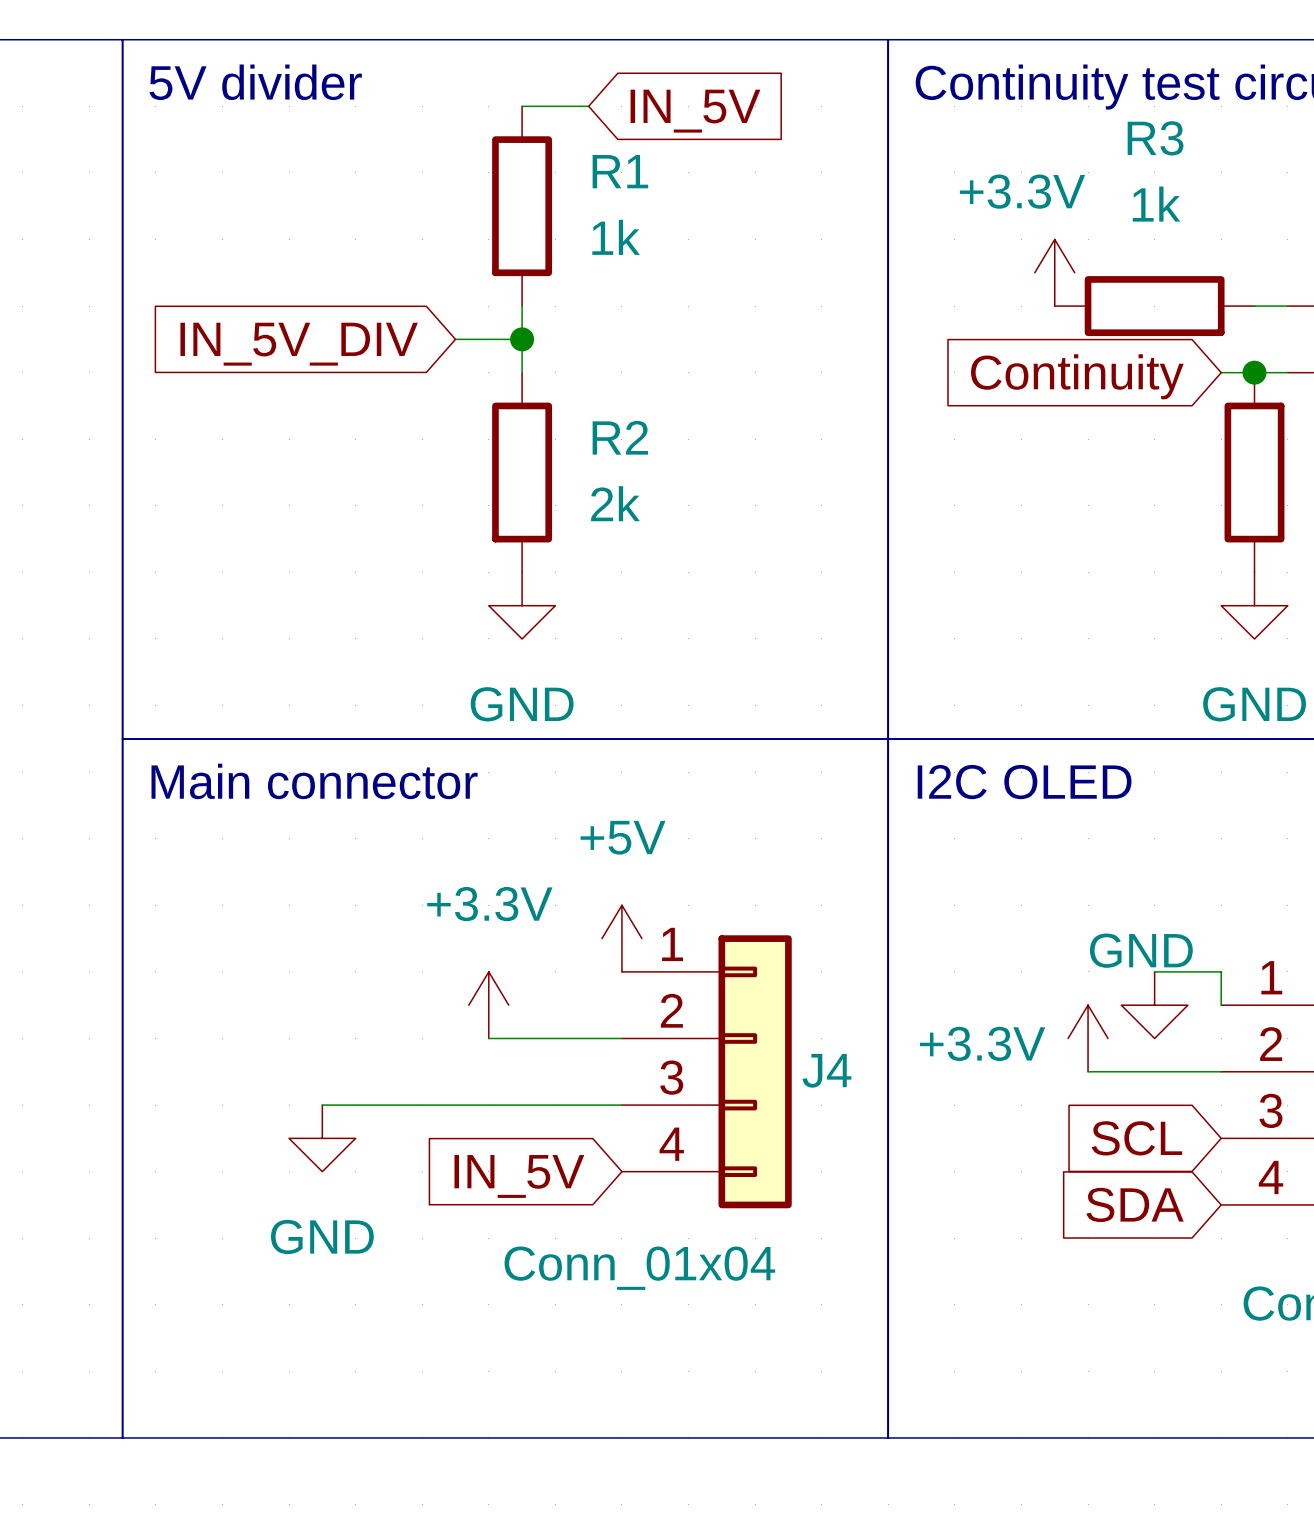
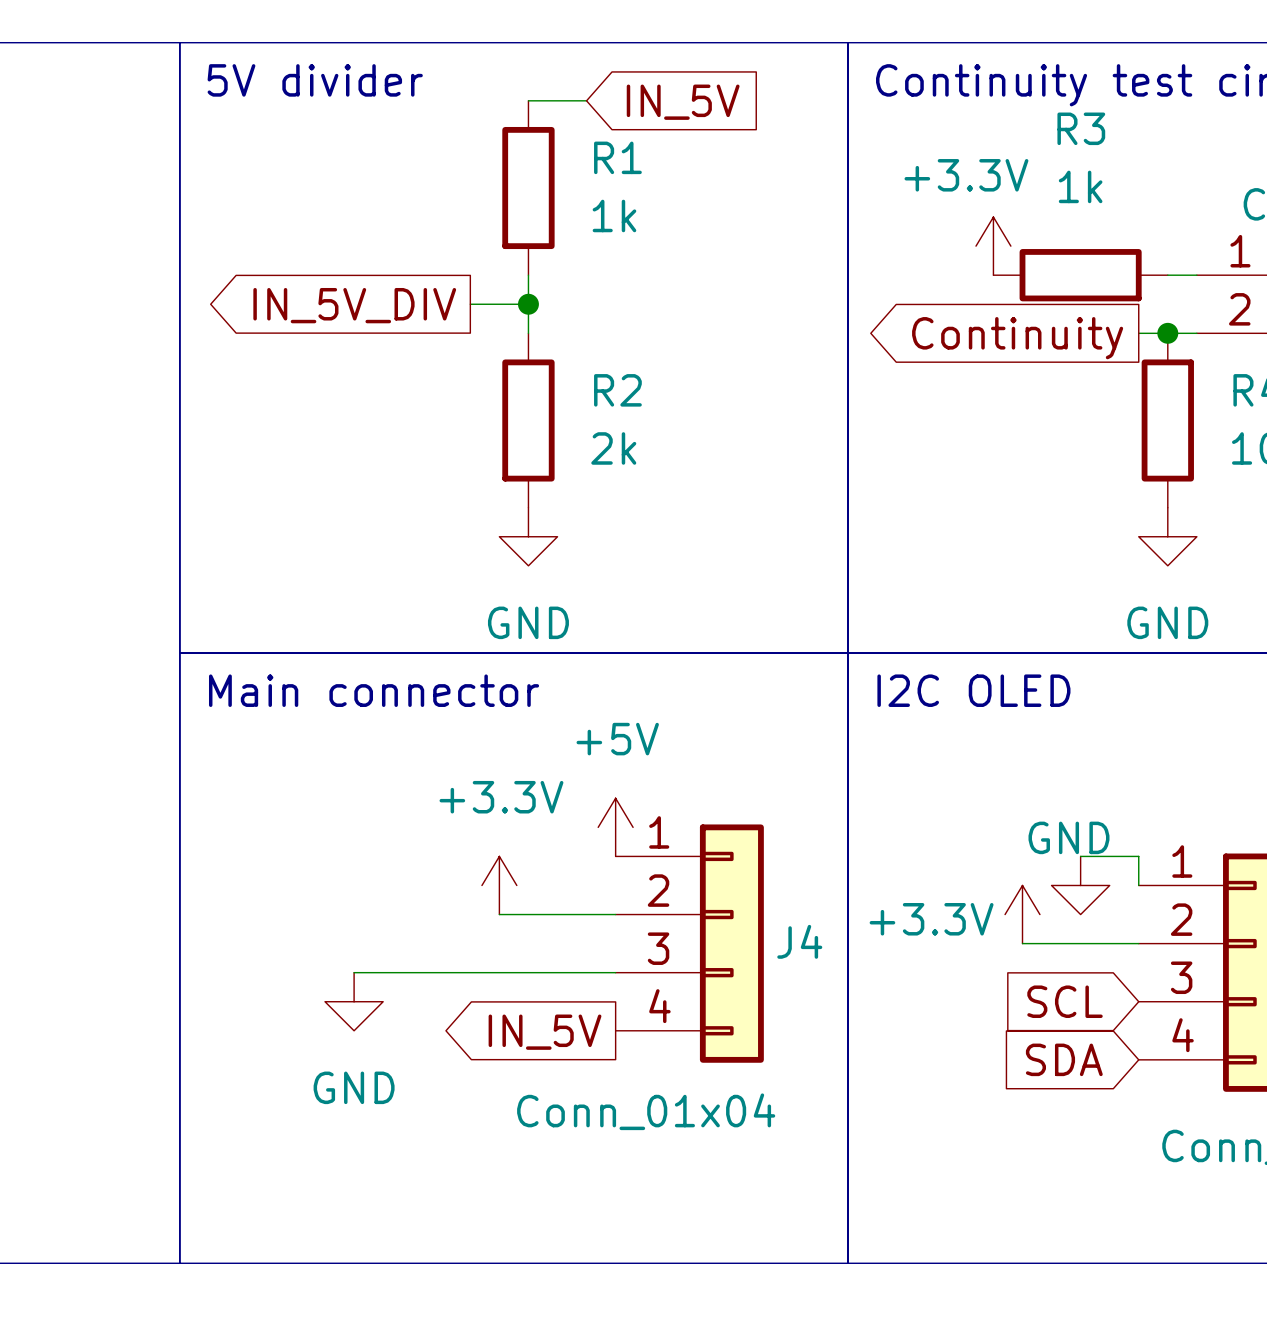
global label shape: input (299, 344) -> output (354, 305)
global label shape: input (1077, 376) -> output (1017, 338)
global label shape: input (519, 1176) -> output (545, 1032)

